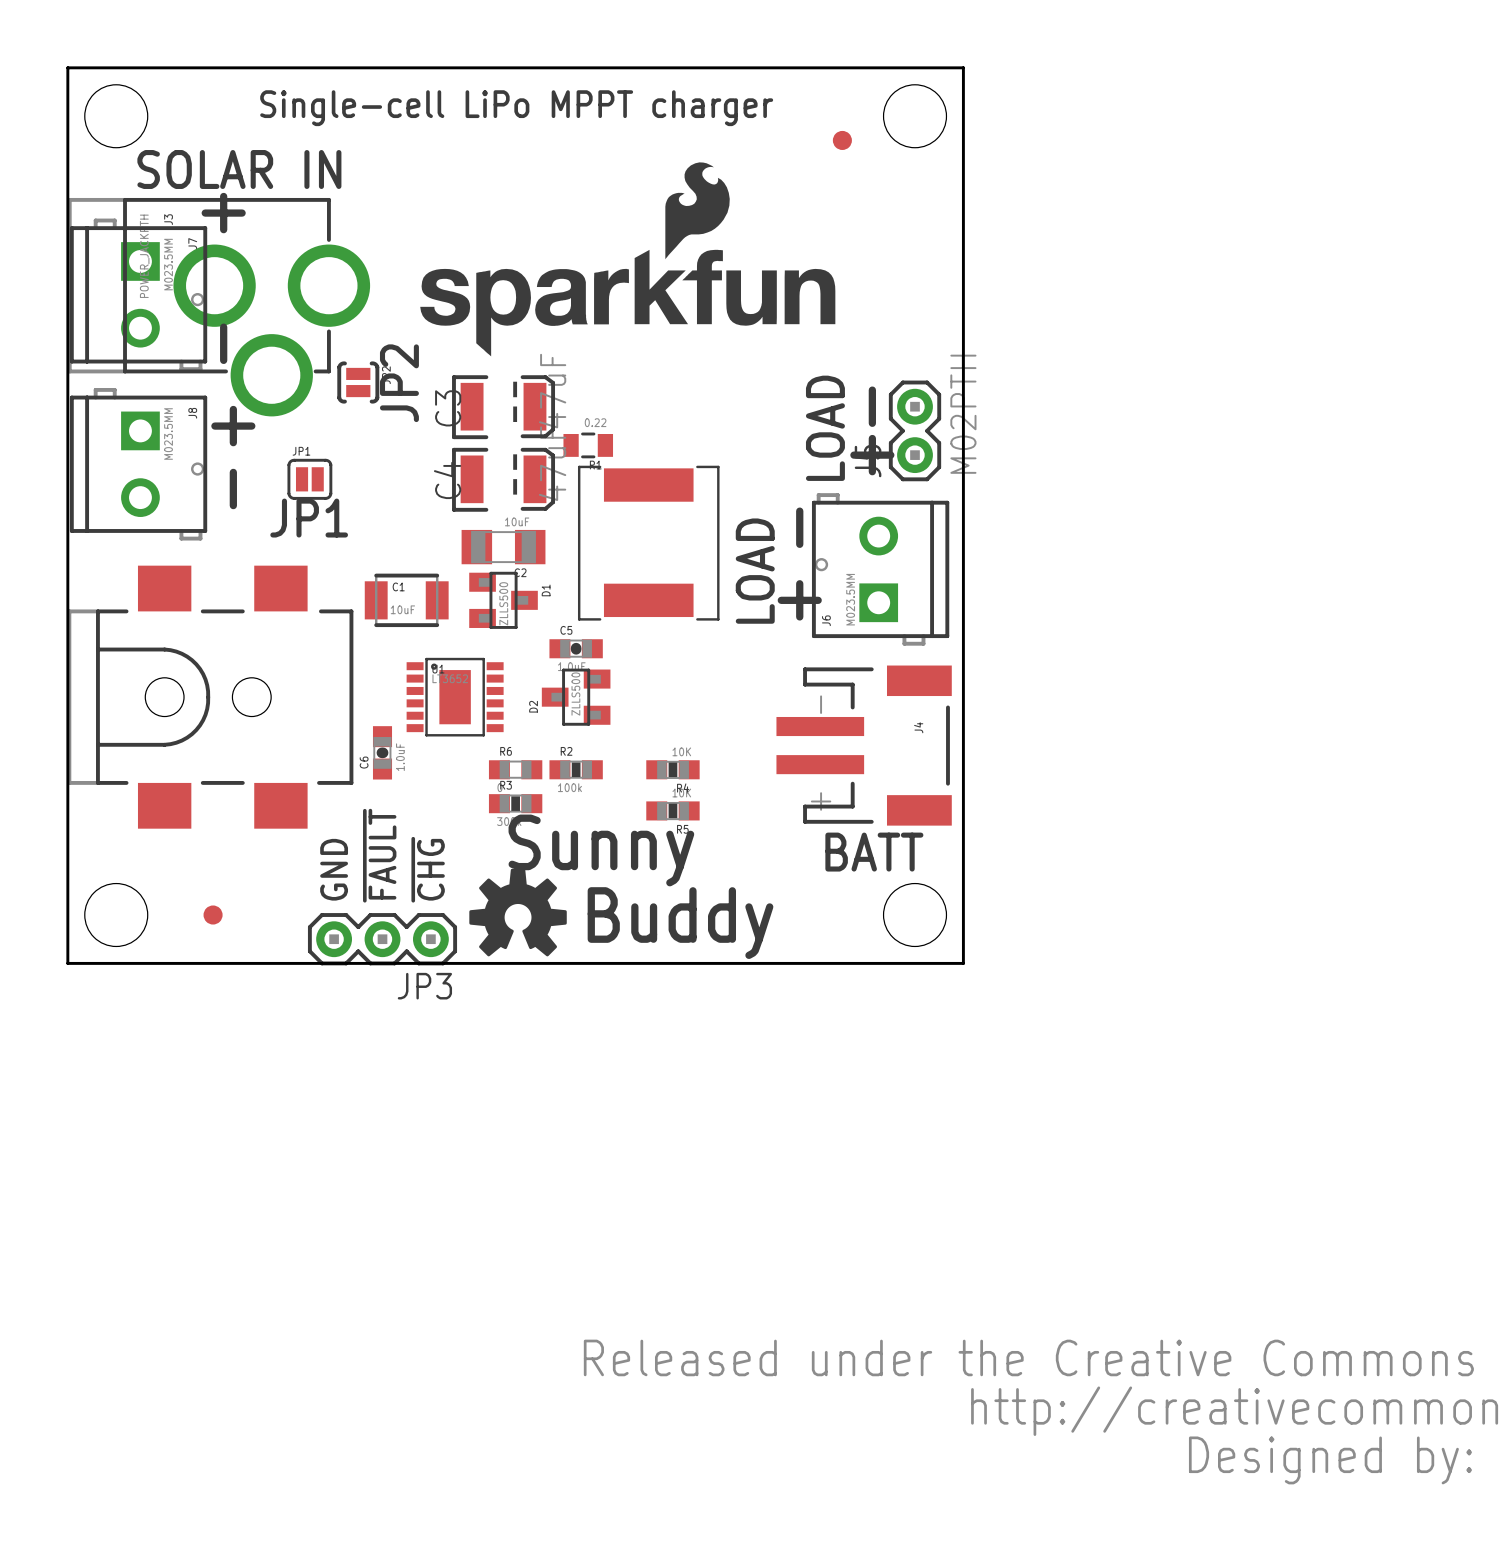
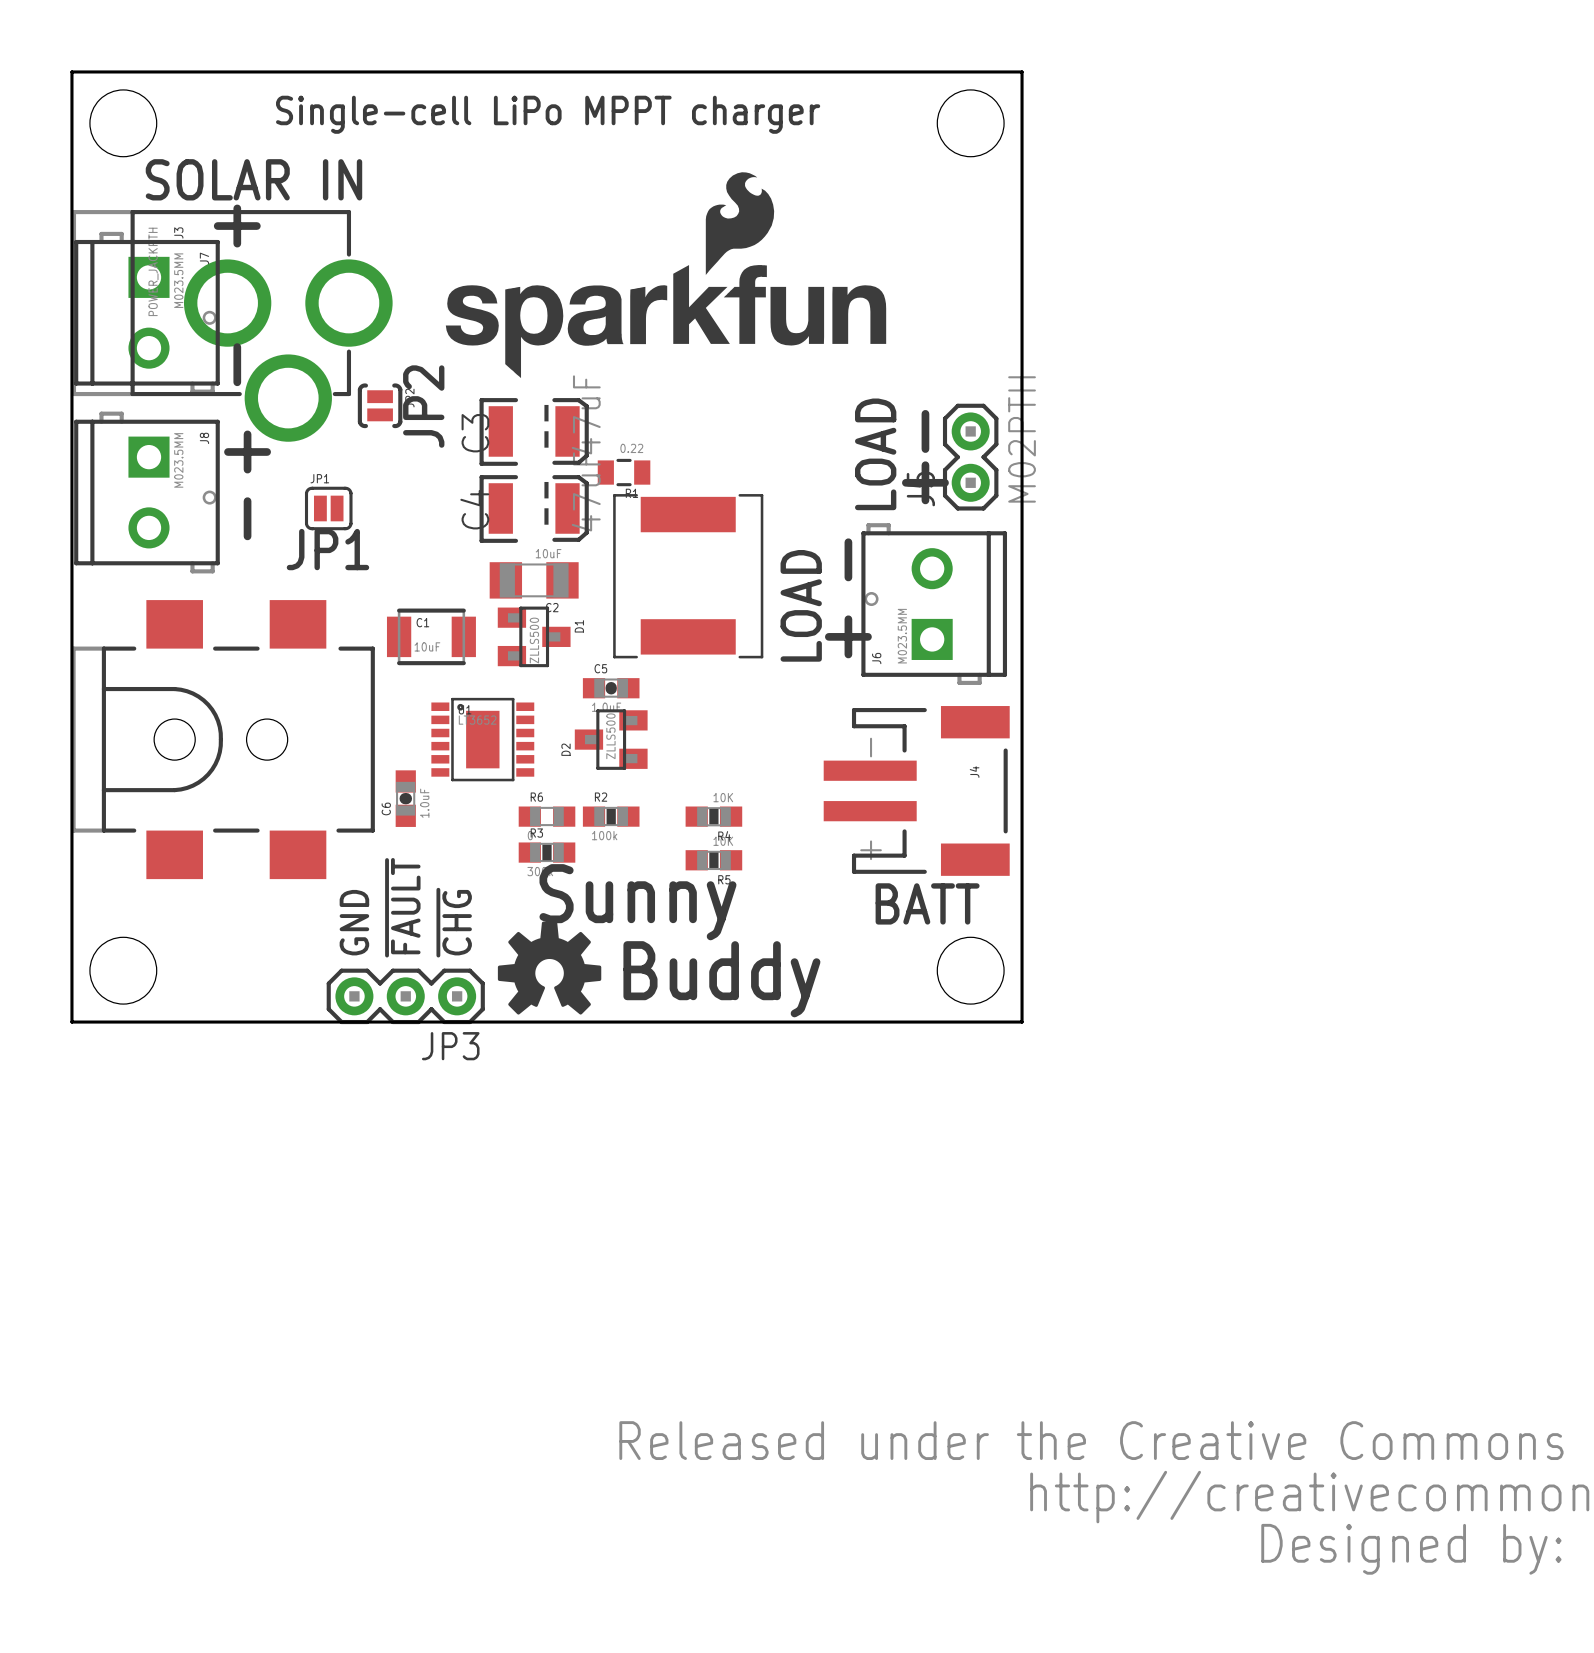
part: (842, 140) -> none
part: (213, 915) -> none

